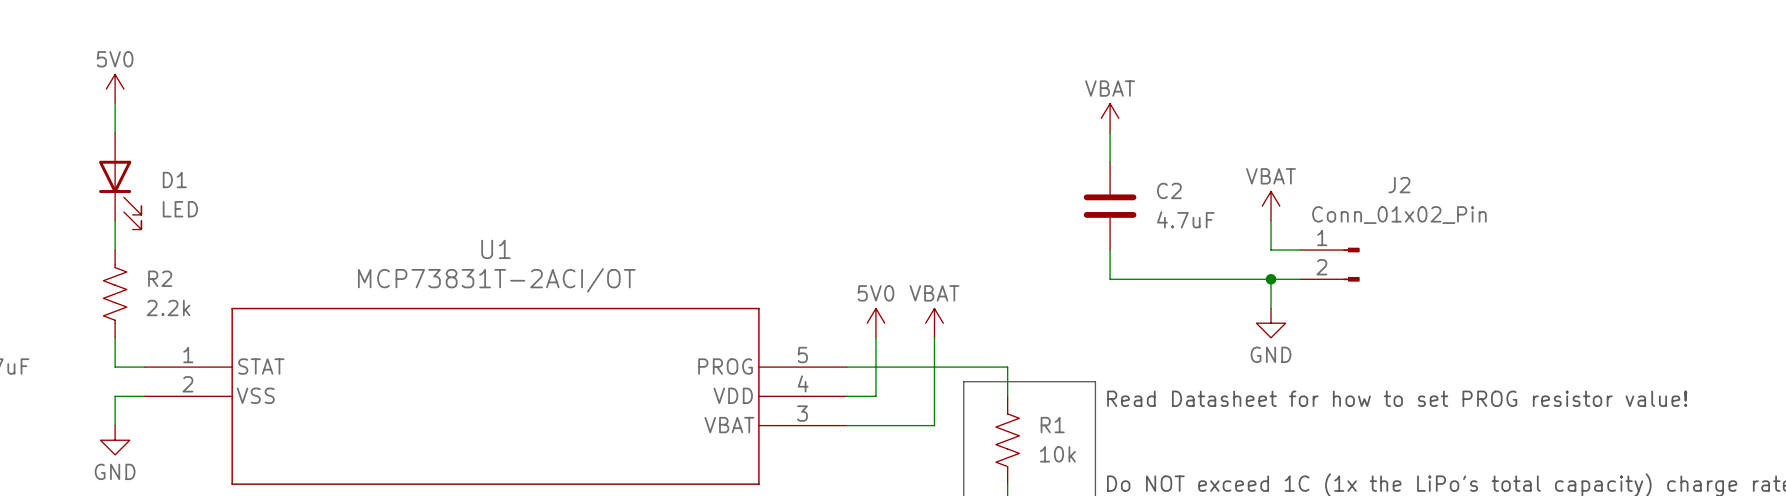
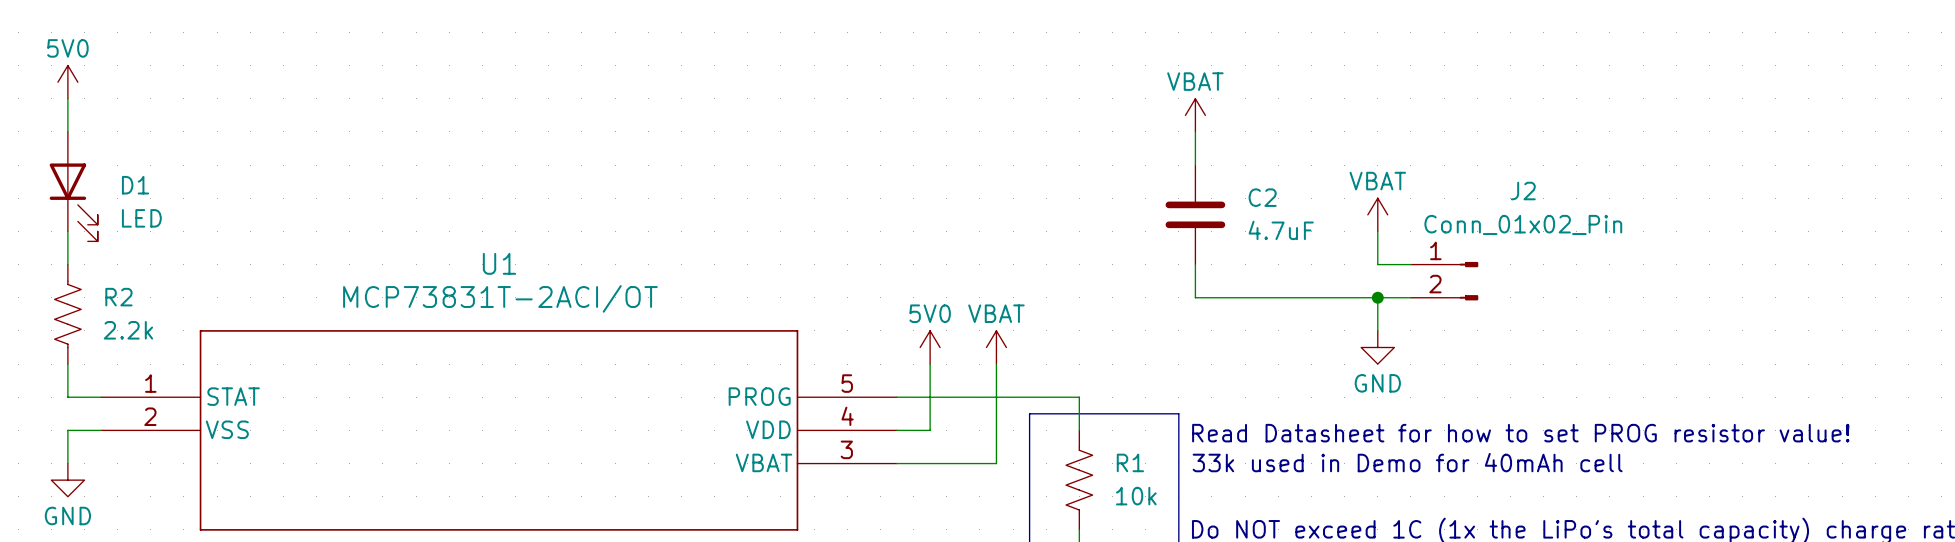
text: none -> 33k used in Demo for 40mAh cell (1407, 462)

